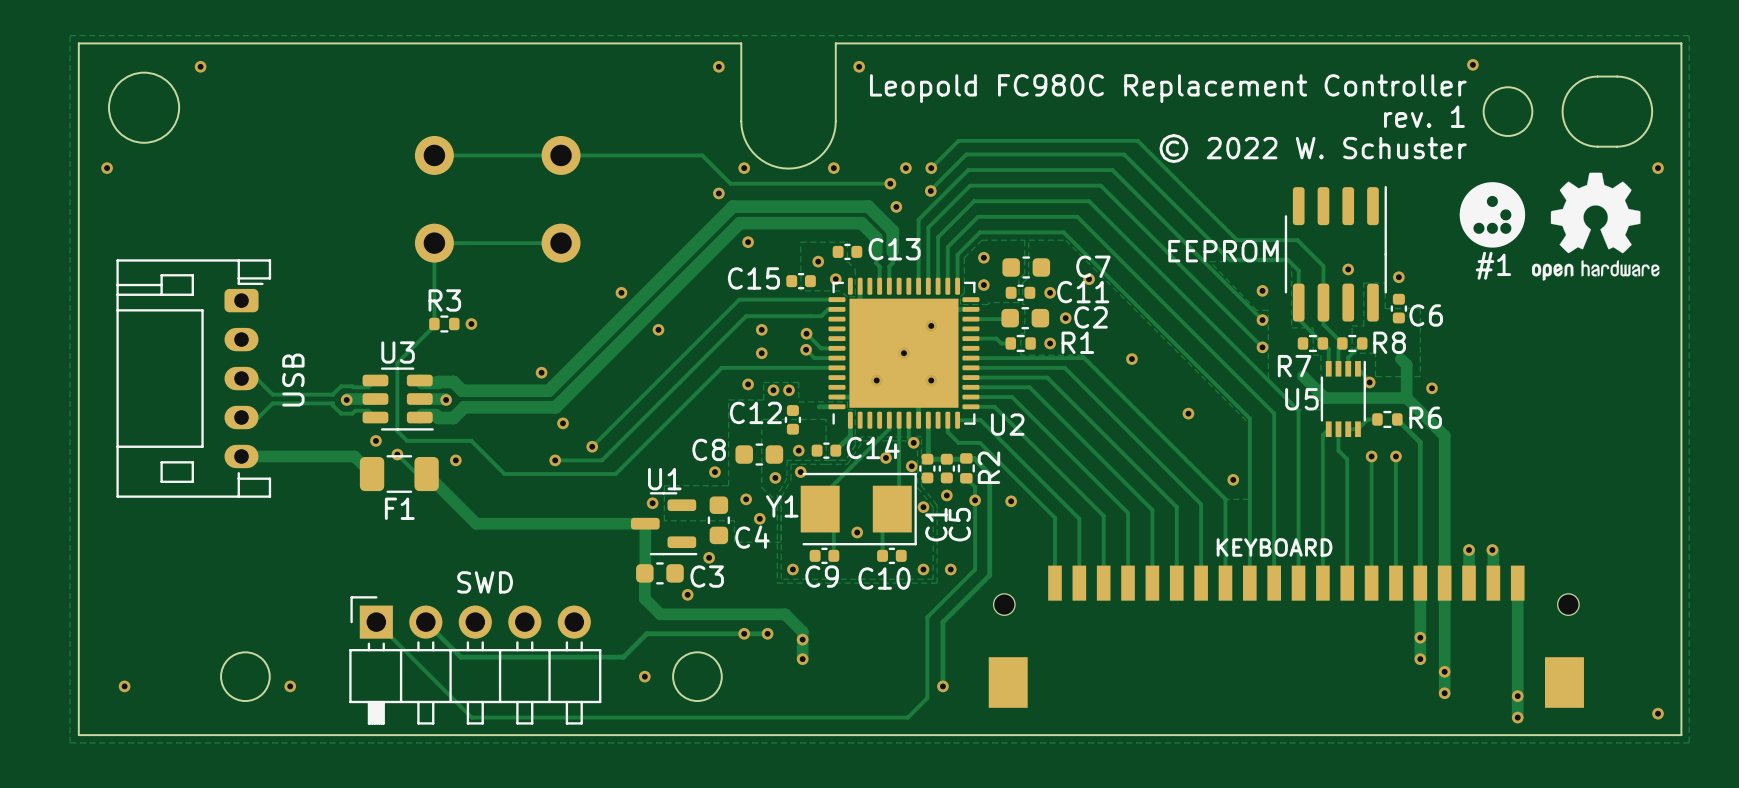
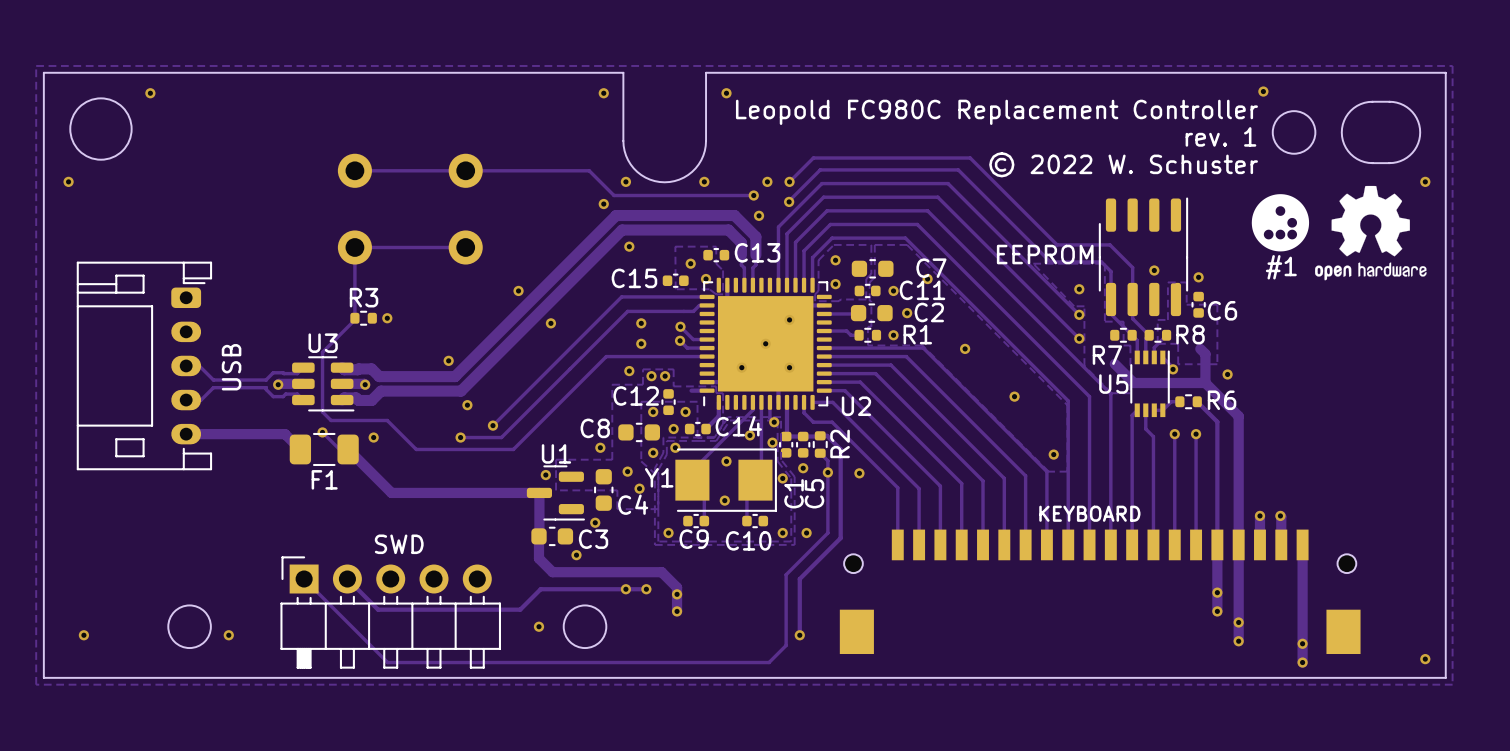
via: none -> (653, 411)
via: none -> (685, 411)
via: (375, 440) -> none
via: none -> (726, 461)

